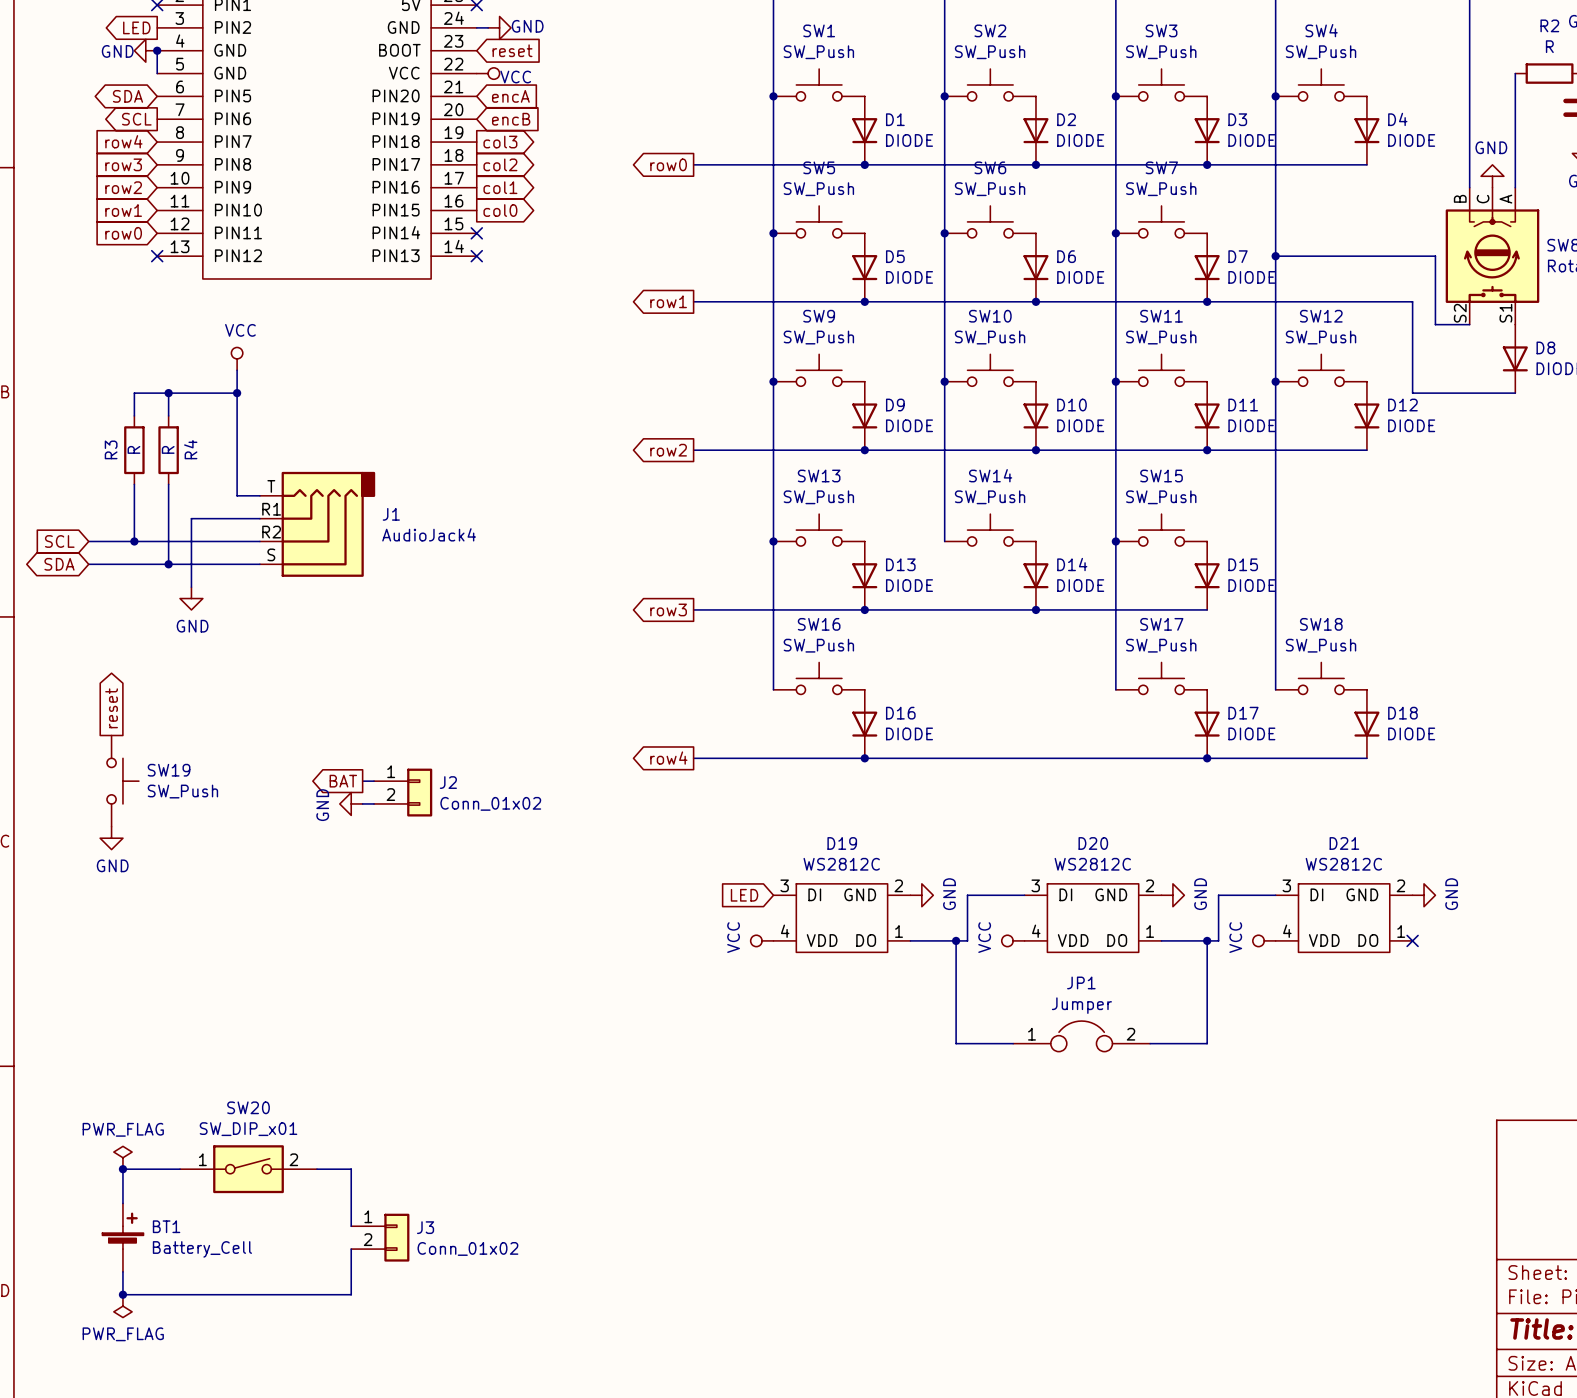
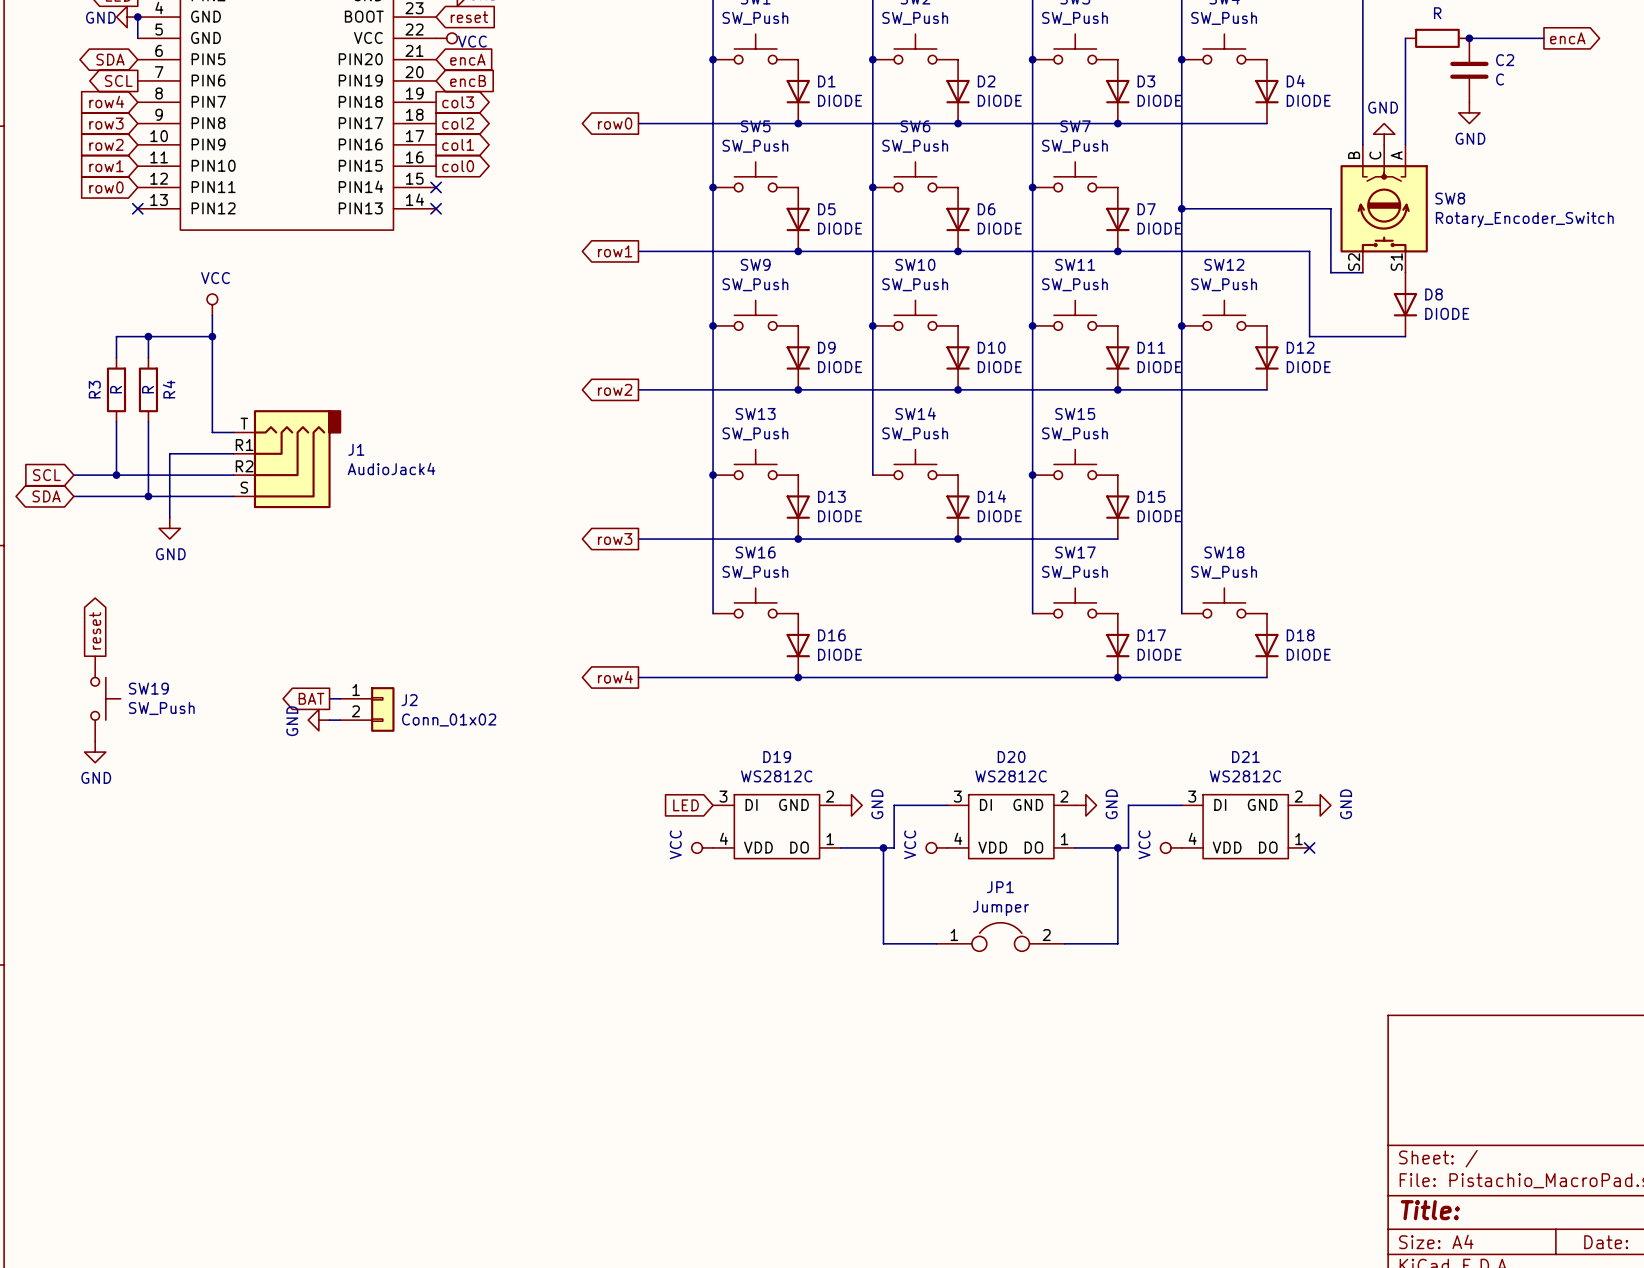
power symbol: PWR_FLAG (122, 1157) -> none
junction: (122, 1169) -> none
wire: (180, 1169) (122, 1169) (122, 1203) -> none
SW20: SW_DIP_x01 (248, 1169) -> none
wire: (316, 1169) (351, 1169) (351, 1226) -> none
BT1: Battery_Cell (122, 1237) -> none
J3: Conn_01x02 (380, 1237) -> none
wire: (351, 1249) (351, 1294) (122, 1294) (122, 1271) -> none
junction: (122, 1294) -> none
power symbol: PWR_FLAG (122, 1306) -> none

